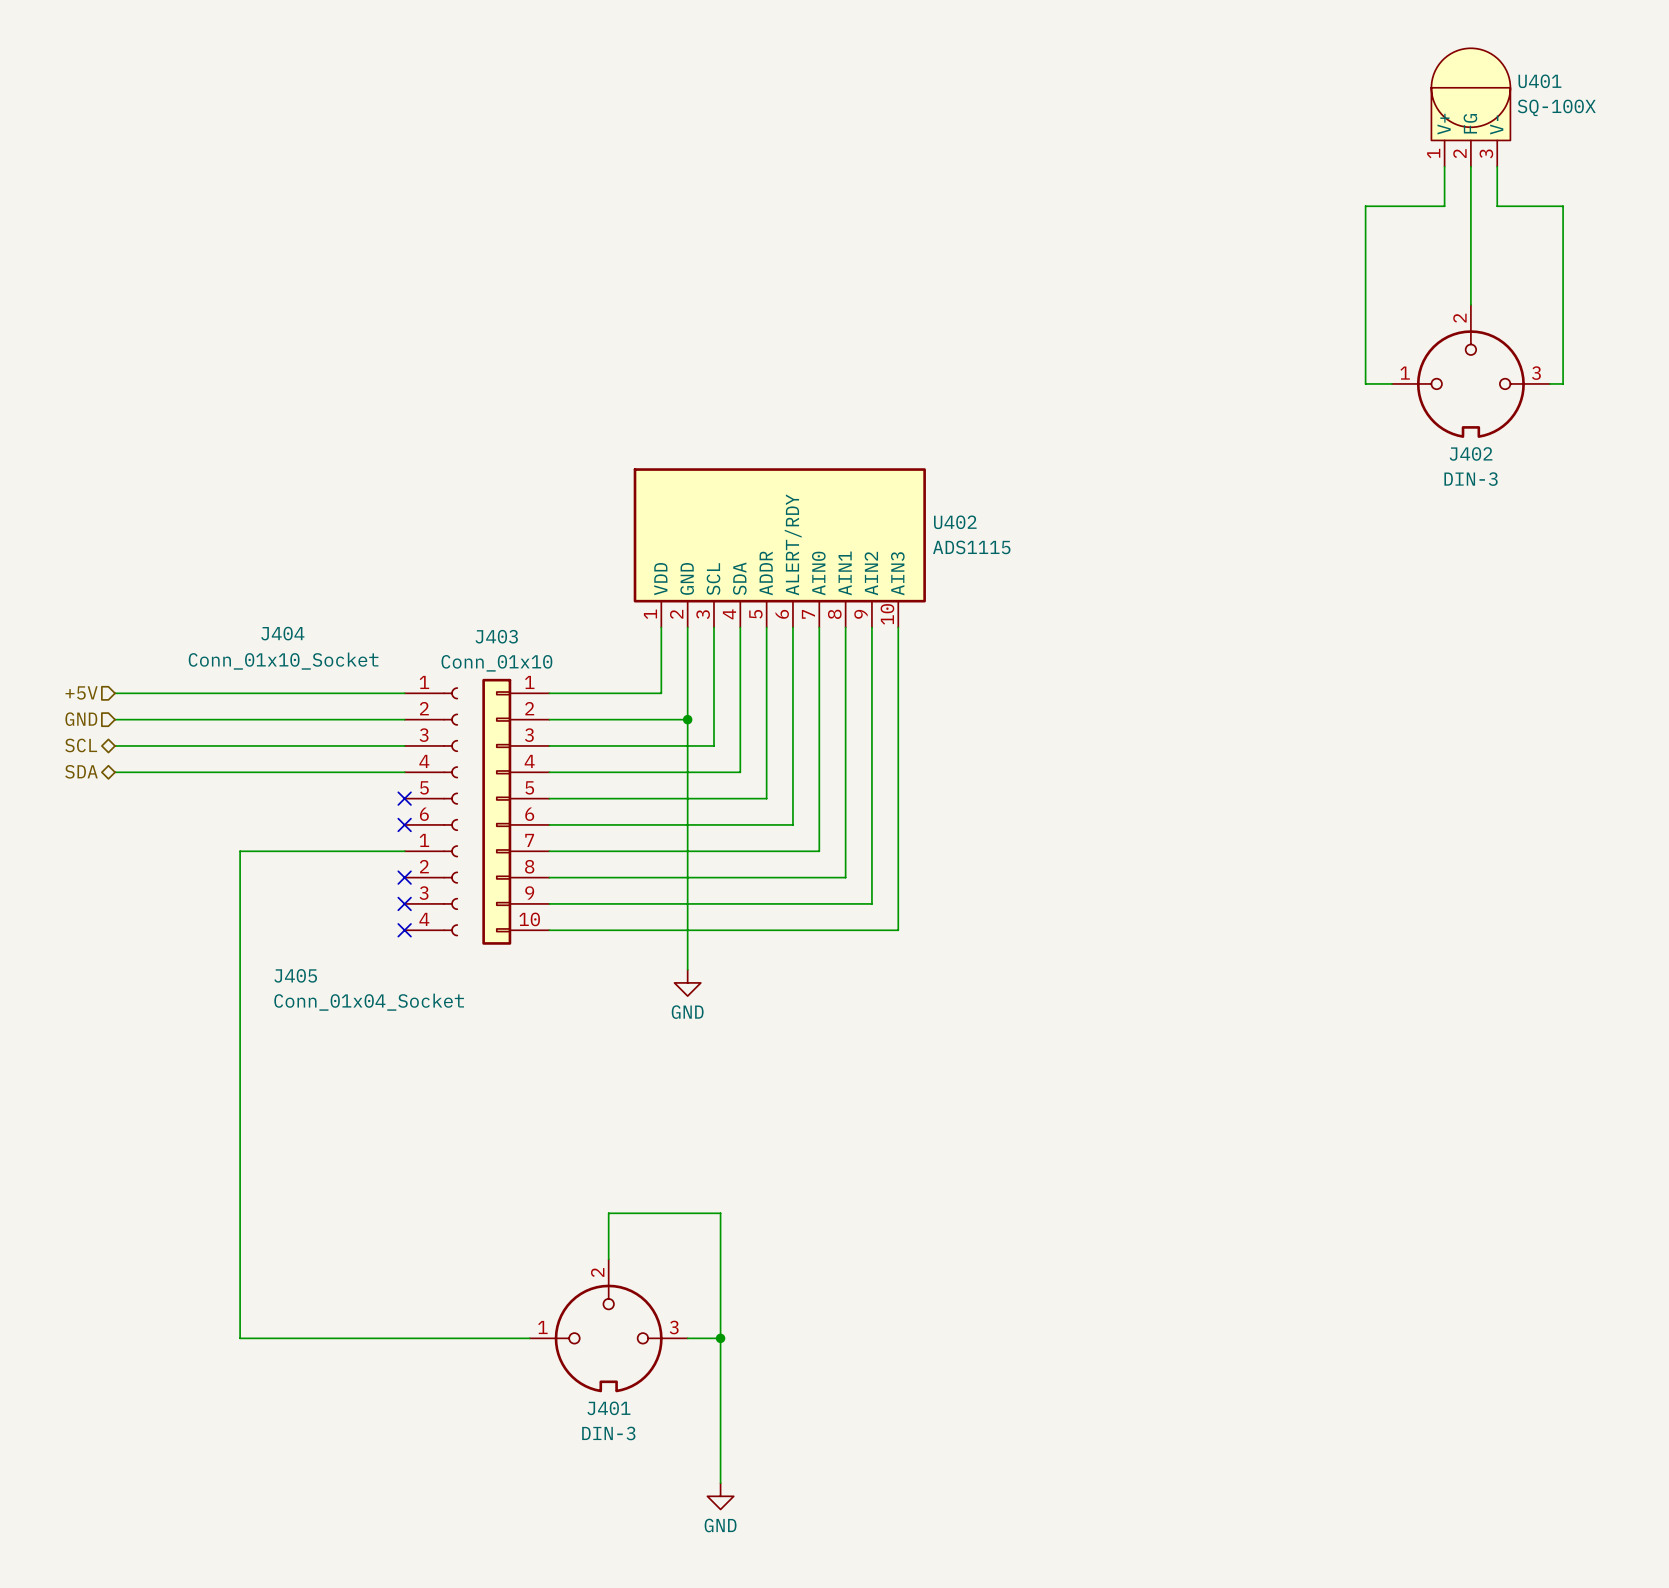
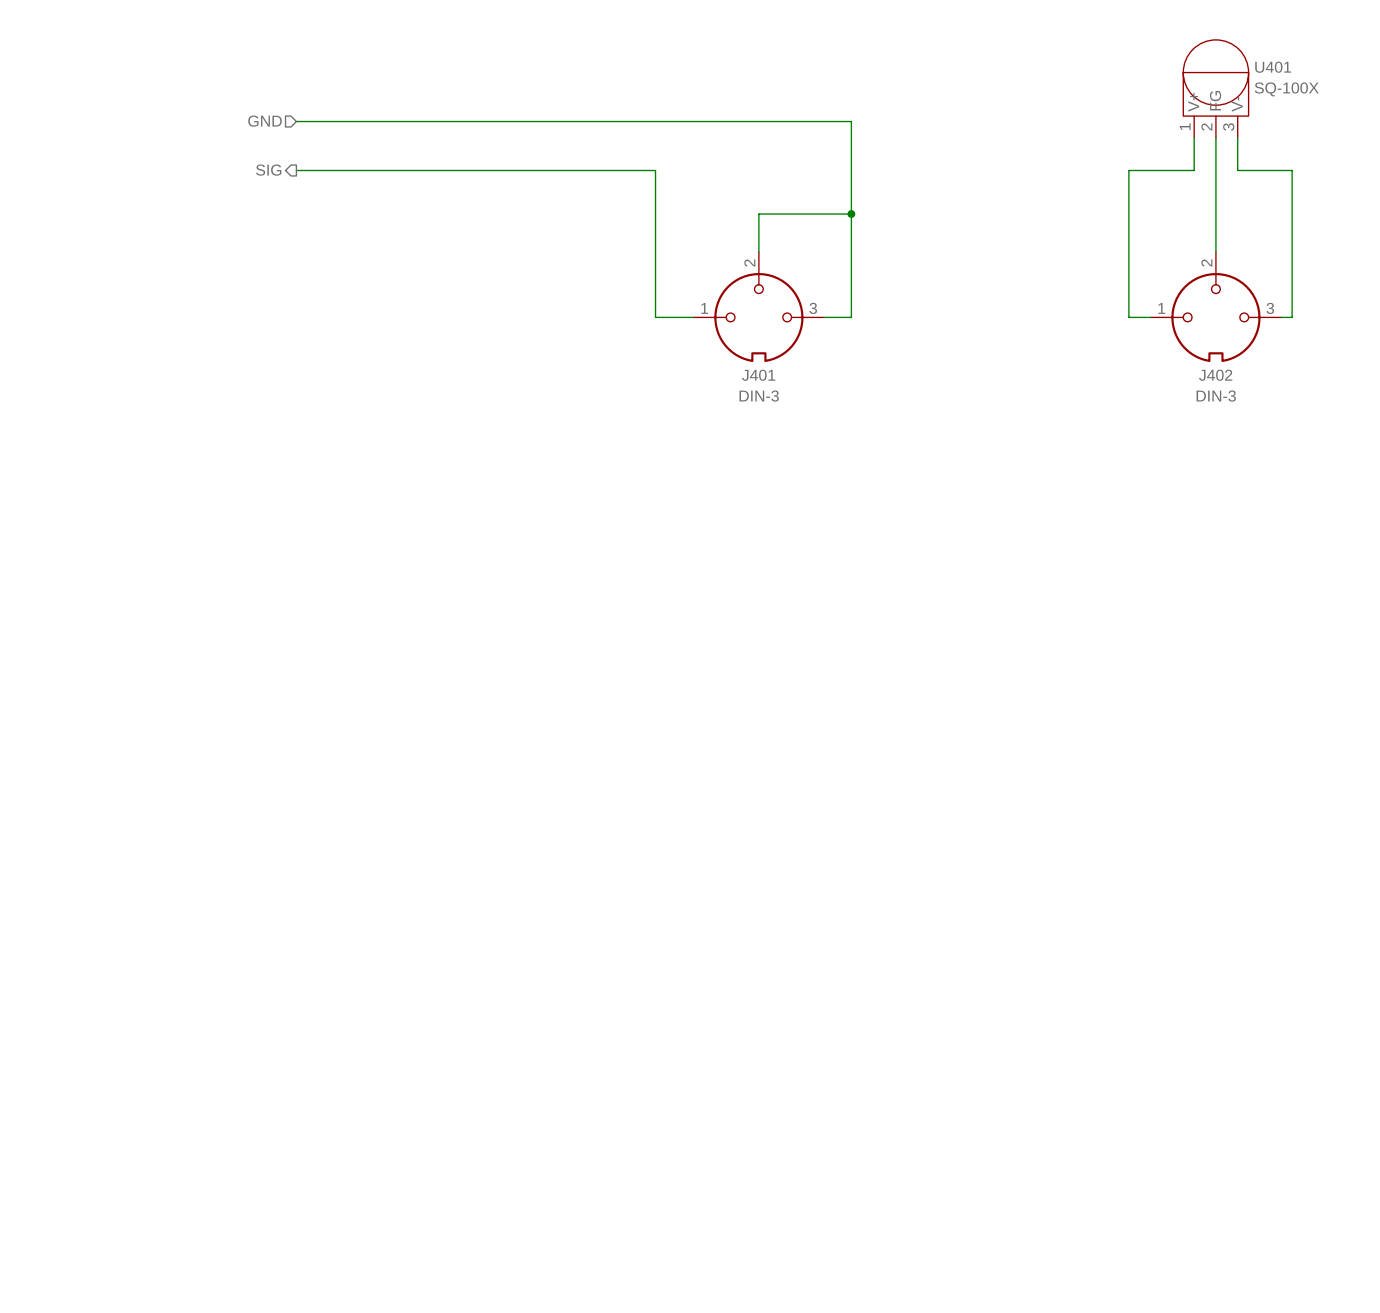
hierarchical label: none -> GND (265, 121)
wire: none -> (296, 121) (851, 121) (851, 317) (824, 317)
hierarchical label: none -> SIG (268, 170)
wire: none -> (296, 170) (655, 170) (655, 317) (693, 317)
wire: none -> (851, 214) (758, 214) (758, 252)
junction: none -> (851, 214)
U402: ADS1115 (779, 547) -> none
wire: (661, 627) (661, 693) (549, 693) -> none
wire: (687, 627) (687, 969) -> none
wire: (713, 627) (713, 745) (549, 745) -> none
wire: (740, 627) (740, 772) (549, 772) -> none
wire: (766, 627) (766, 798) (549, 798) -> none
wire: (792, 627) (792, 824) (549, 824) -> none
wire: (819, 627) (819, 851) (549, 851) -> none
wire: (845, 627) (845, 877) (549, 877) -> none
wire: (871, 627) (871, 903) (549, 903) -> none
wire: (898, 627) (898, 930) (549, 930) -> none
hierarchical label: +5V (81, 692) -> none
wire: (115, 693) (404, 693) -> none
hierarchical label: GND (81, 719) -> none
wire: (115, 719) (404, 719) -> none
wire: (549, 719) (687, 719) -> none
junction: (687, 719) -> none
hierarchical label: SCL (81, 745) -> none
wire: (115, 745) (404, 745) -> none
J404: Conn_01x10_Socket (431, 759) -> none
hierarchical label: SDA (81, 771) -> none
wire: (115, 772) (404, 772) -> none
no-connect mark: (404, 798) -> none
J403: Conn_01x10 (515, 811) -> none
no-connect mark: (404, 824) -> none
wire: (404, 851) (240, 851) (240, 1338) (529, 1338) -> none
no-connect mark: (404, 877) -> none
J405: Conn_01x04_Socket (431, 890) -> none
no-connect mark: (404, 903) -> none
no-connect mark: (404, 930) -> none
power symbol: GND (687, 982) -> none
wire: (608, 1259) (608, 1213) (720, 1213) (720, 1483) -> none
J401 position: (608, 1325) -> (758, 307)
wire: (687, 1338) (720, 1338) -> none
junction: (720, 1338) -> none
power symbol: GND (720, 1496) -> none

